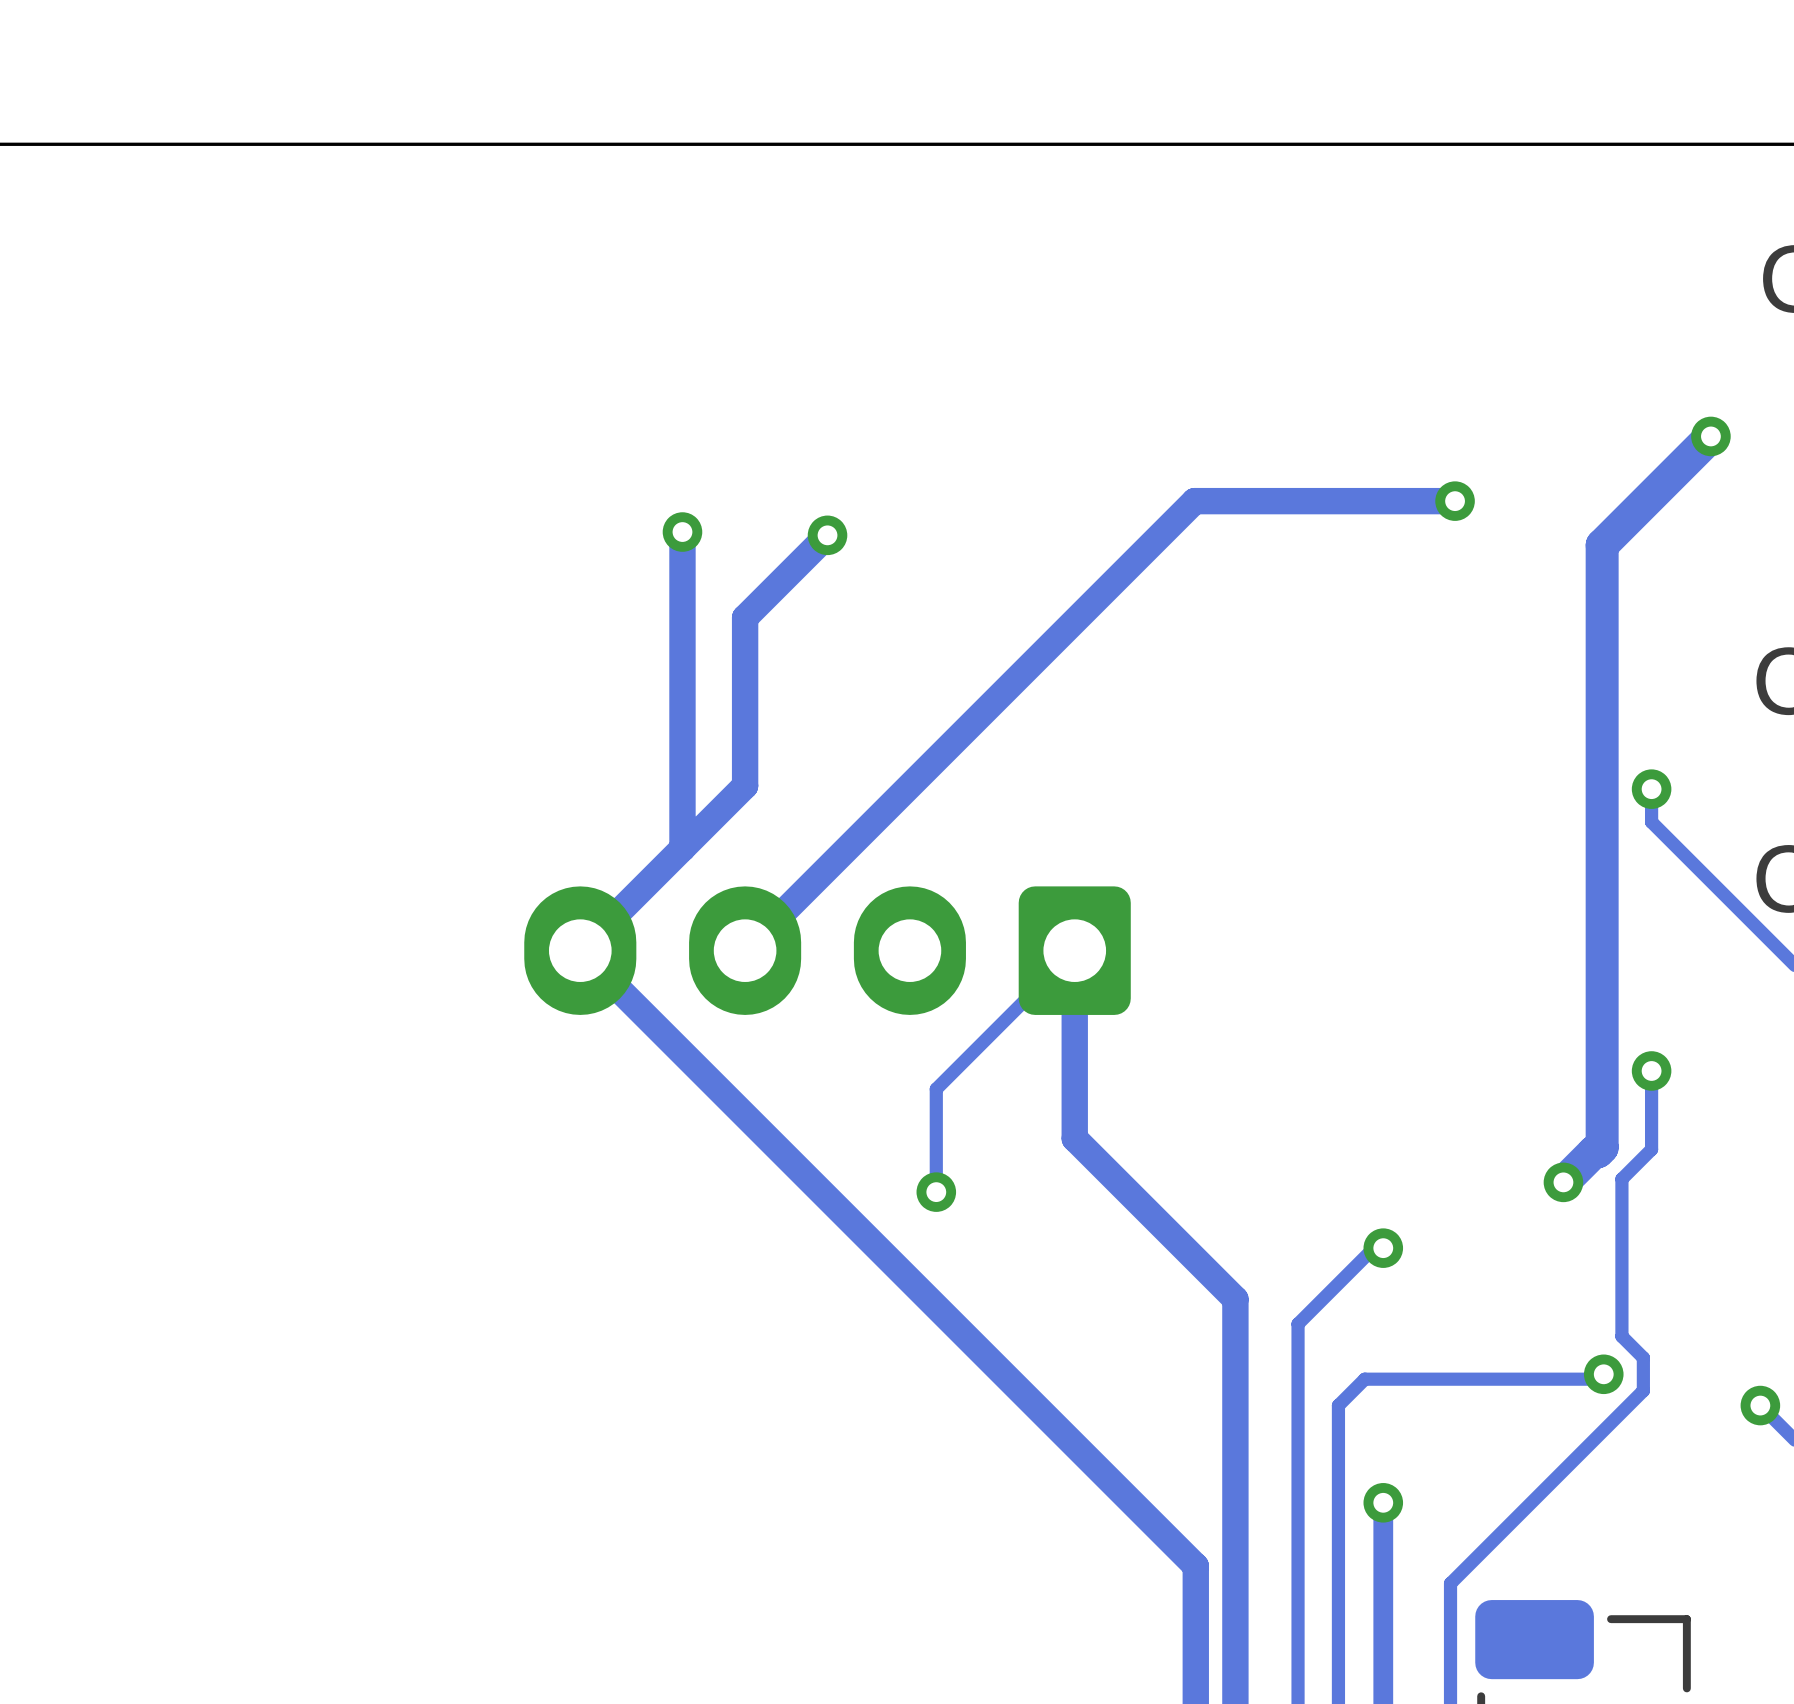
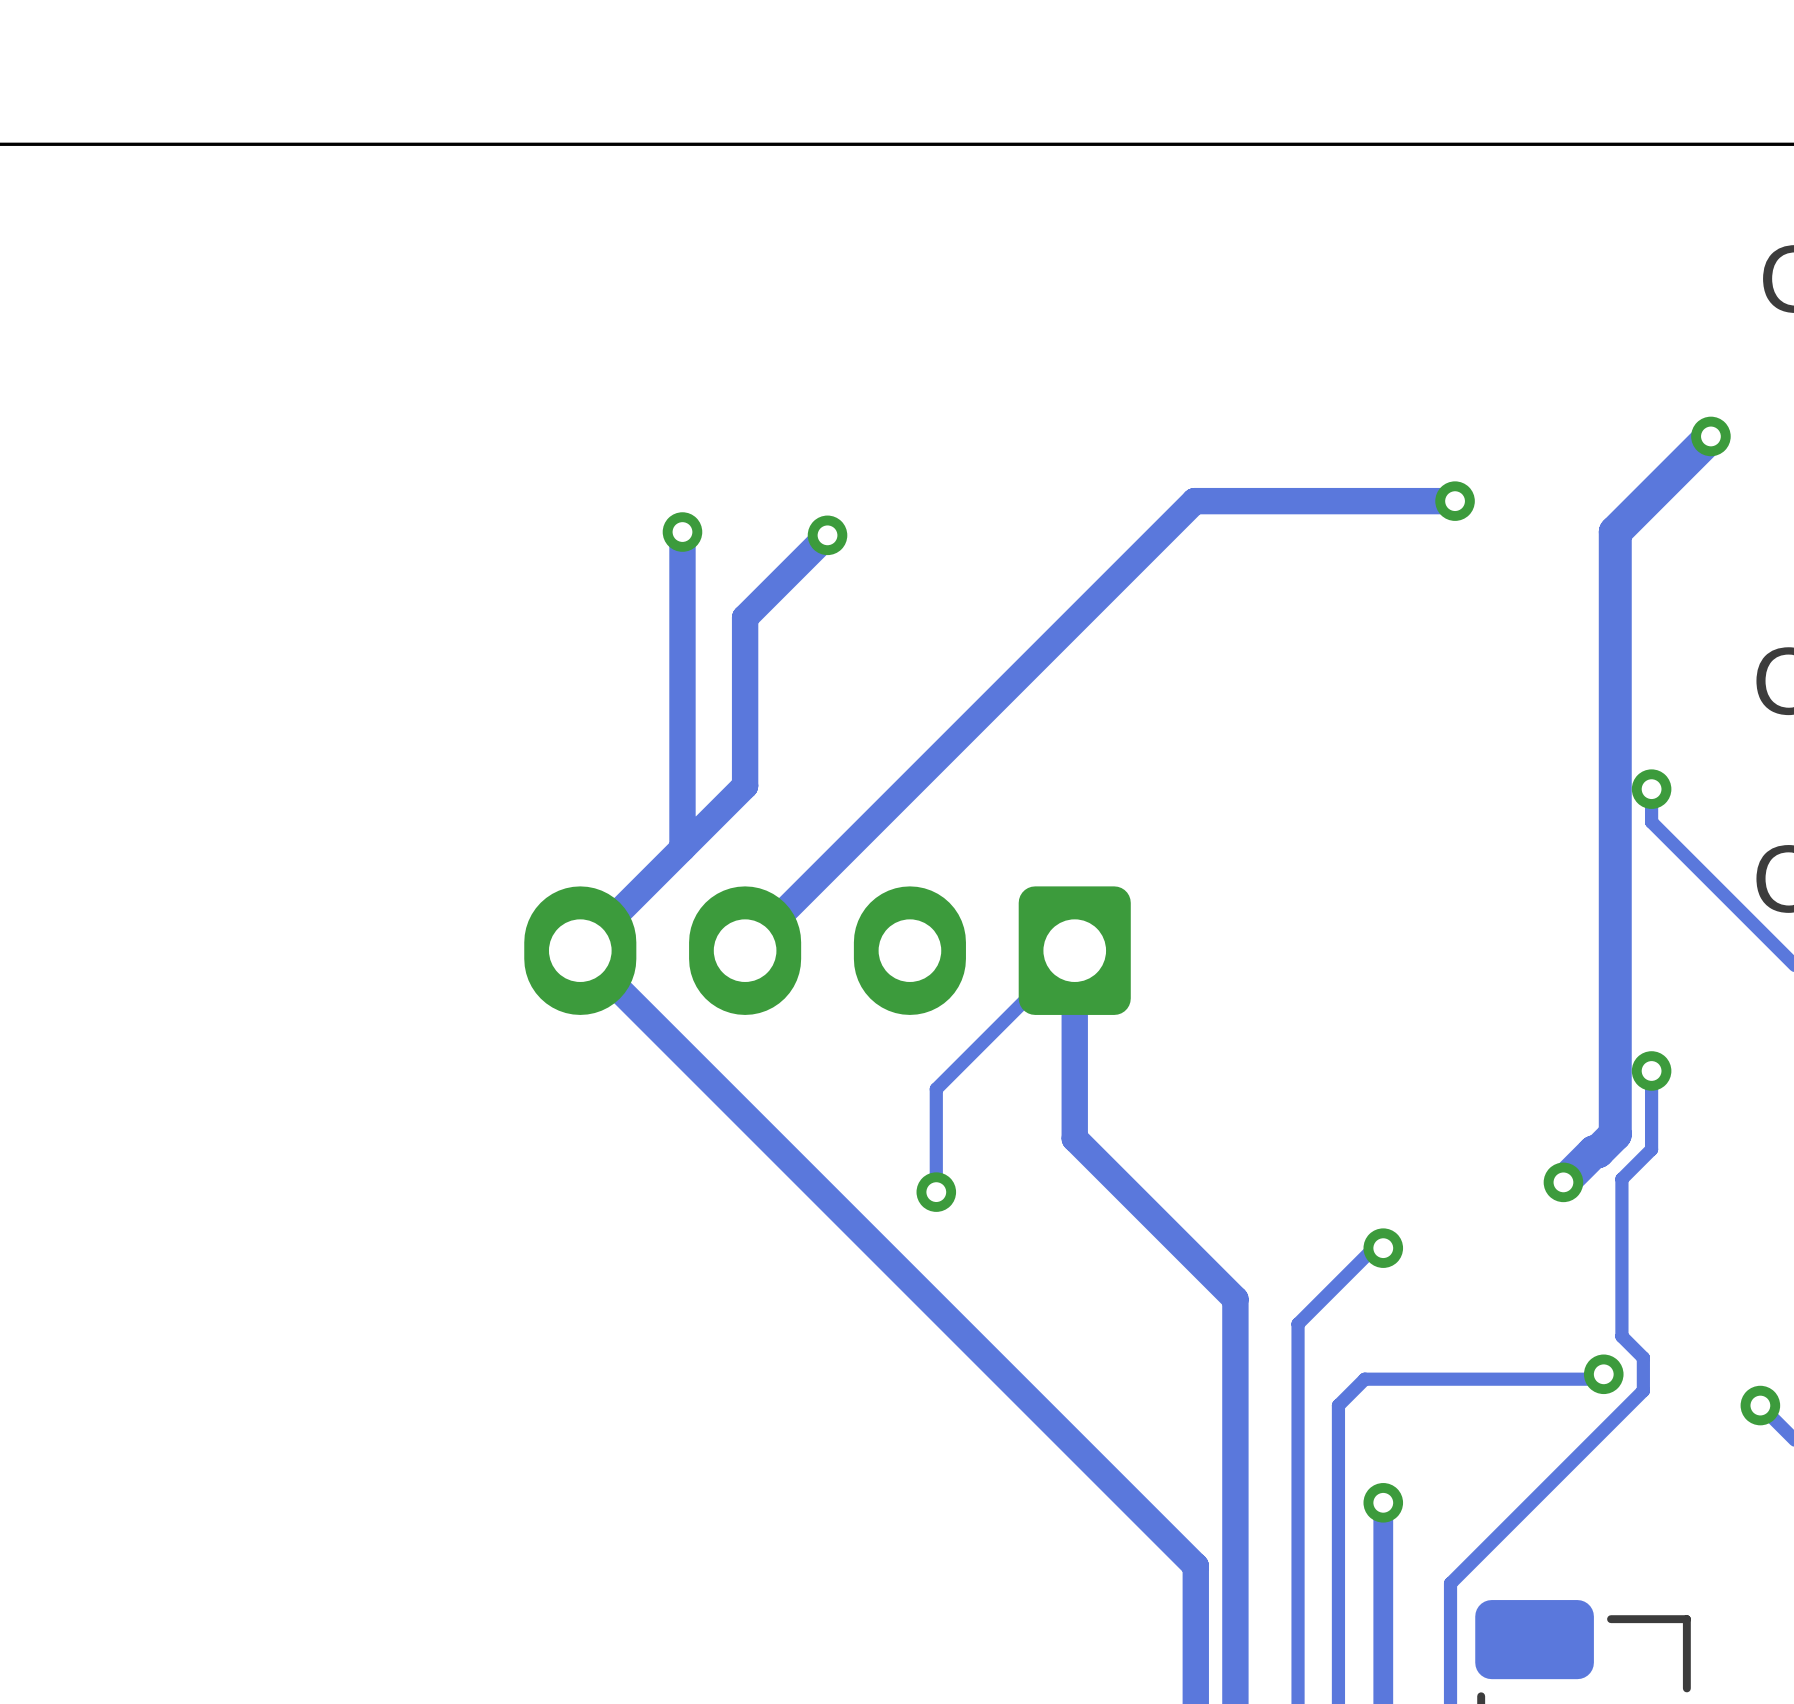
track: (1615, 532) (1602, 545) (1602, 1147) -> (1615, 532) (1615, 1134) (1602, 1147)

